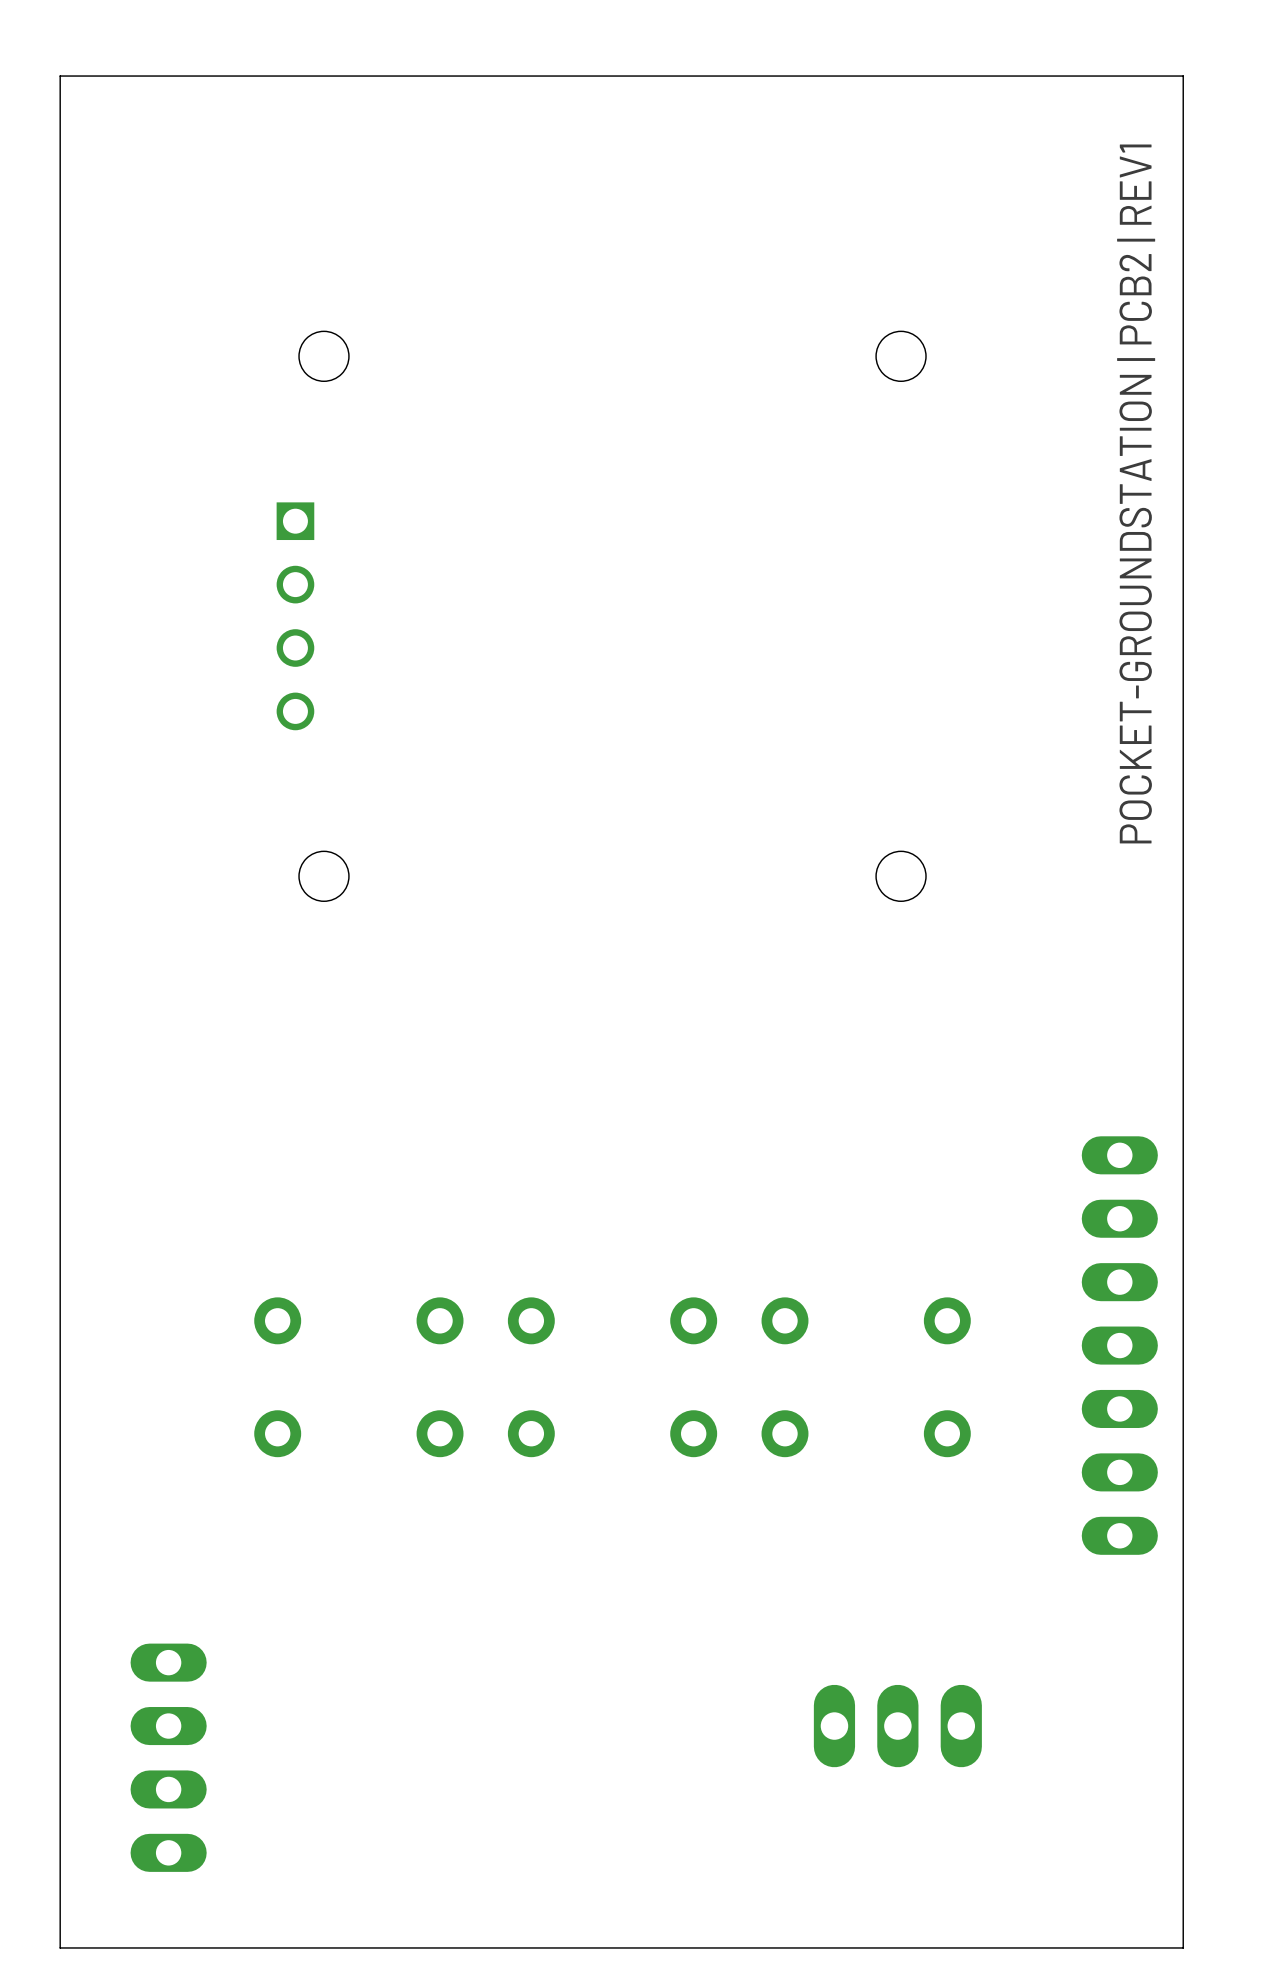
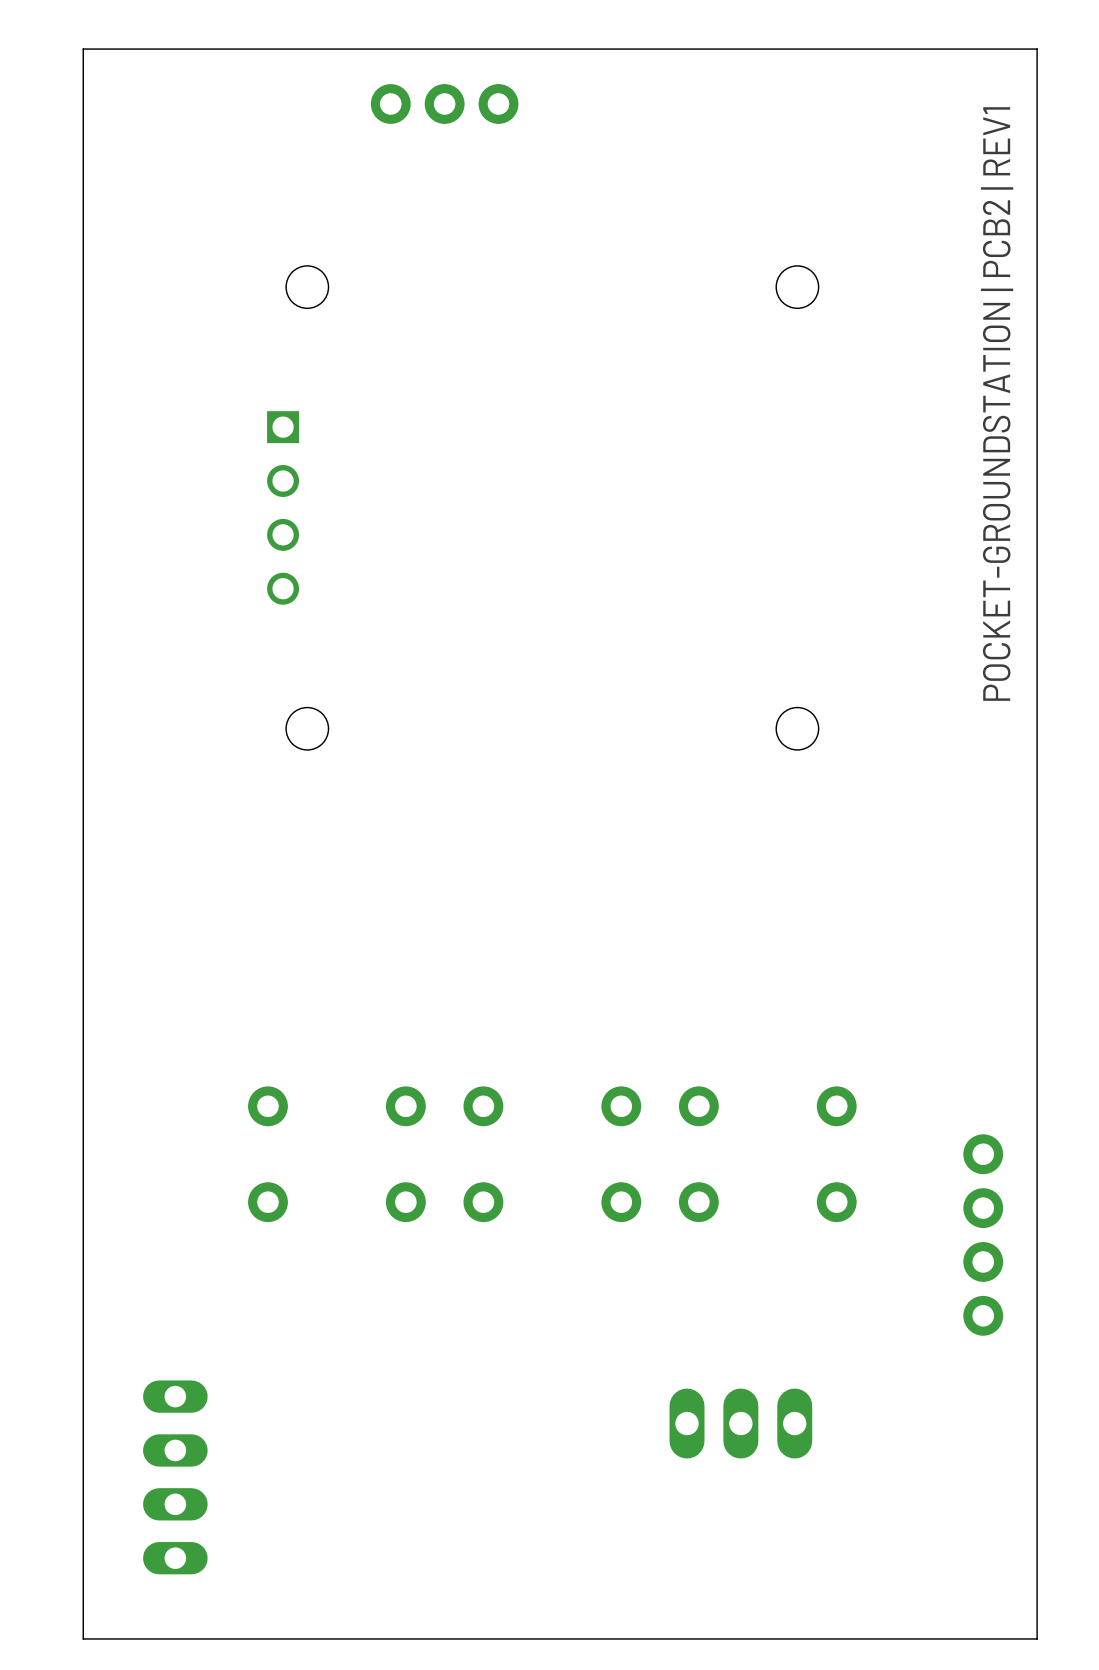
part: none -> (444, 103)
part: (1119, 1345) -> none
part: none -> (983, 1235)
part position: (897, 1726) -> (740, 1423)

